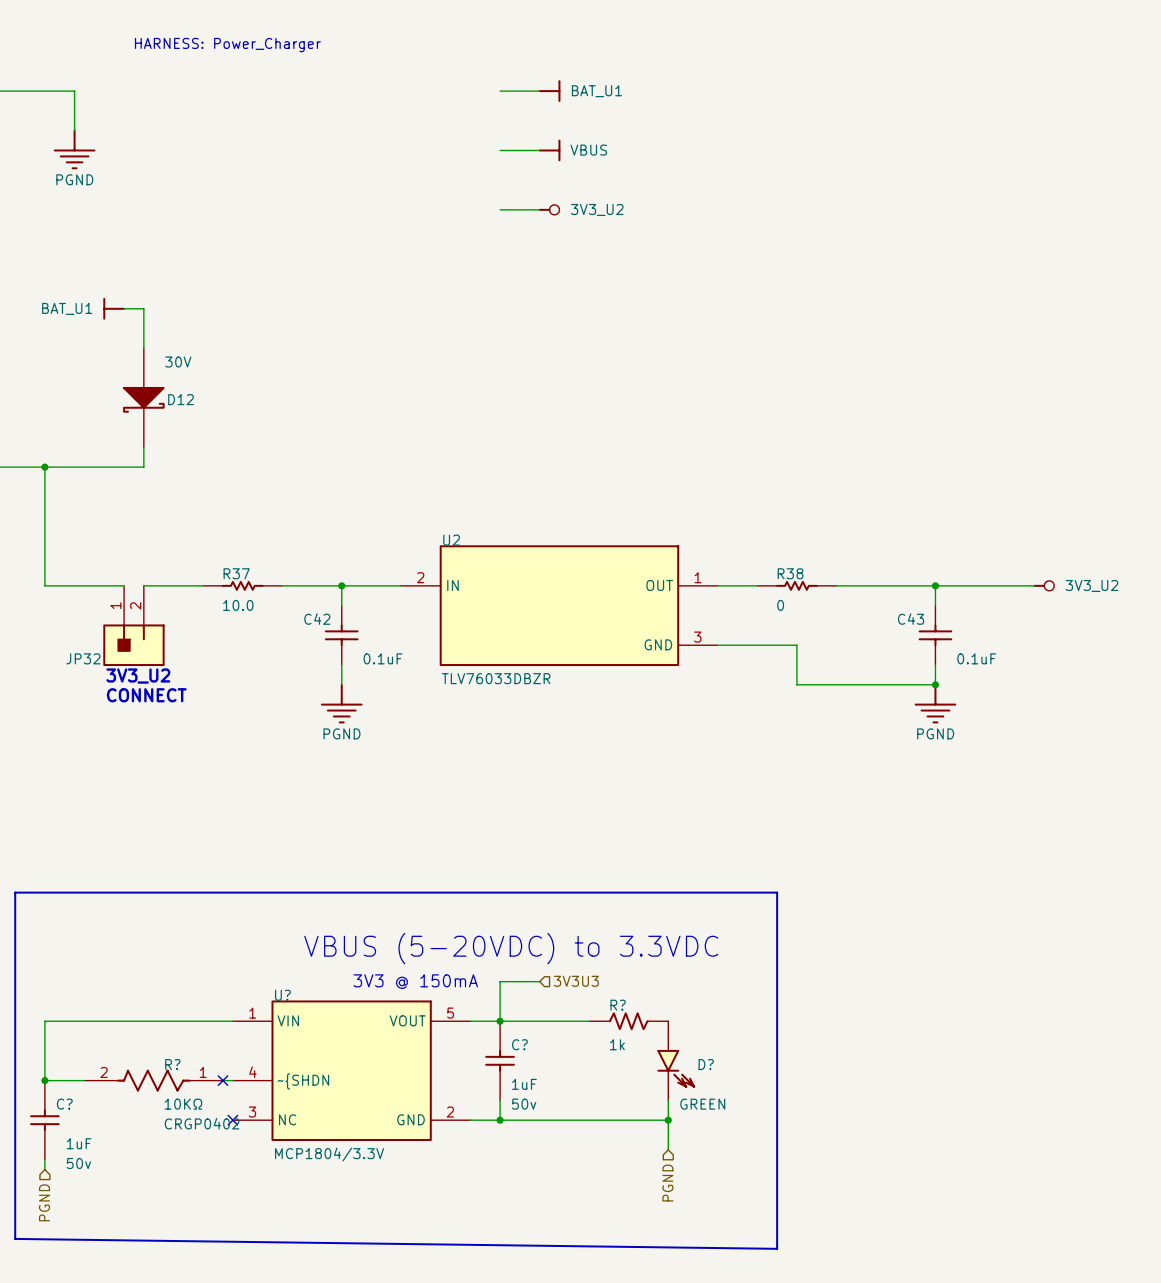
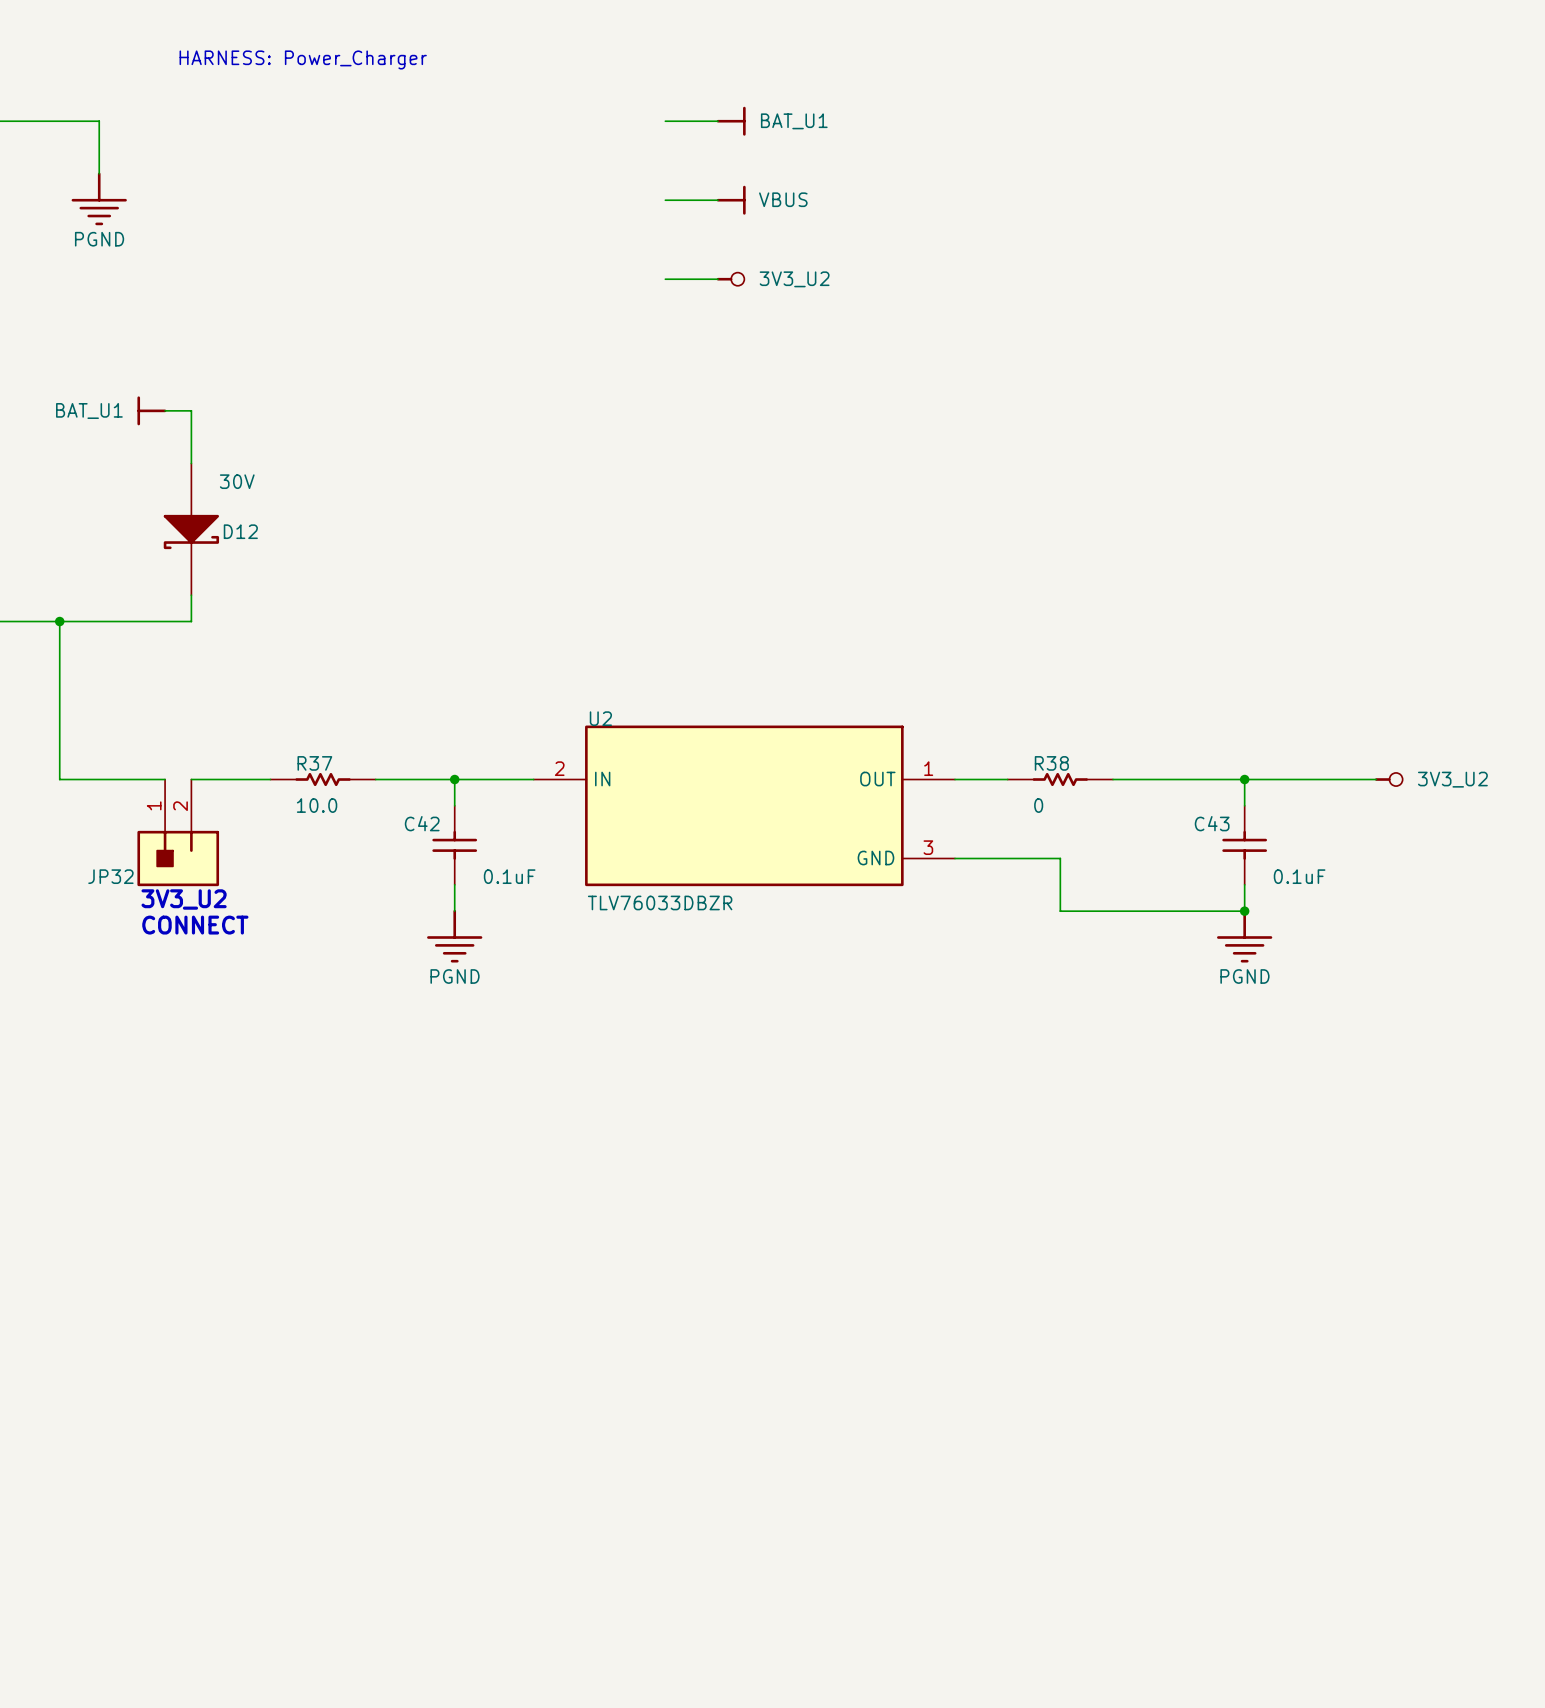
line: (15, 892) (777, 892) (777, 1248) (15, 1238) (15, 892) -> none
text: VBUS (5-20VDC) to 3.3VDC (511, 948) -> none
text: 3V3 @ 150mA (415, 981) -> none
wire: (539, 981) (500, 981) (500, 1021) -> none
hierarchical label: 3V3U3 (576, 981) -> none
wire: (232, 1021) (44, 1021) (44, 1080) (84, 1080) -> none
wire: (470, 1021) (589, 1021) -> none
junction: (500, 1021) -> none
R?: (628, 1021) -> none
C?: (500, 1060) -> none
D?: (676, 1060) -> none
U?: (351, 1070) -> none
junction: (44, 1080) -> none
R?: (153, 1080) -> none
wire: (223, 1080) (232, 1080) -> none
no-connect mark: (223, 1080) -> none
wire: (500, 1100) (500, 1120) -> none
wire: (668, 1100) (668, 1149) -> none
C?: (44, 1120) -> none
no-connect mark: (232, 1120) -> none
wire: (470, 1120) (668, 1120) -> none
junction: (500, 1120) -> none
junction: (668, 1120) -> none
wire: (44, 1159) (44, 1169) -> none
hierarchical label: PGND (667, 1183) -> none
hierarchical label: PGND (44, 1202) -> none

